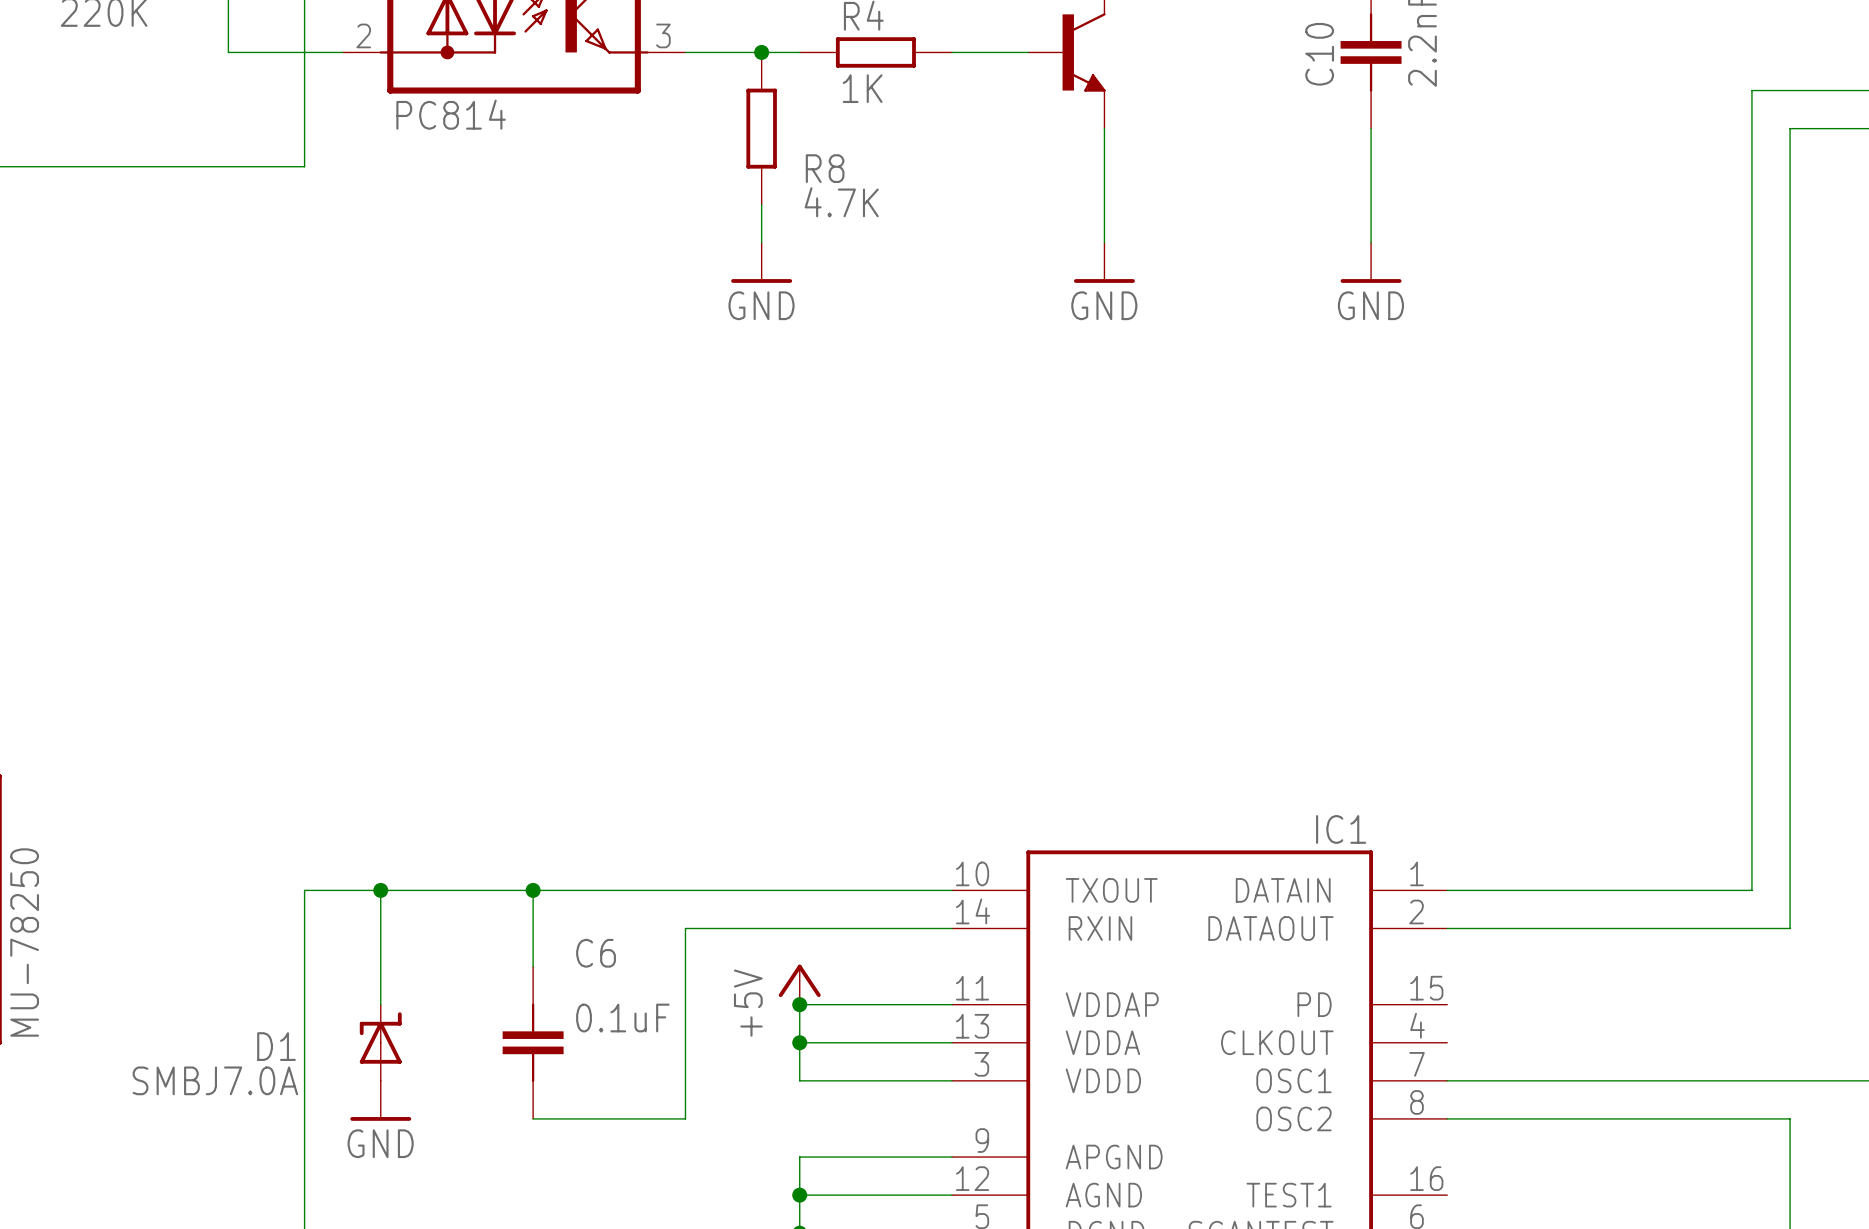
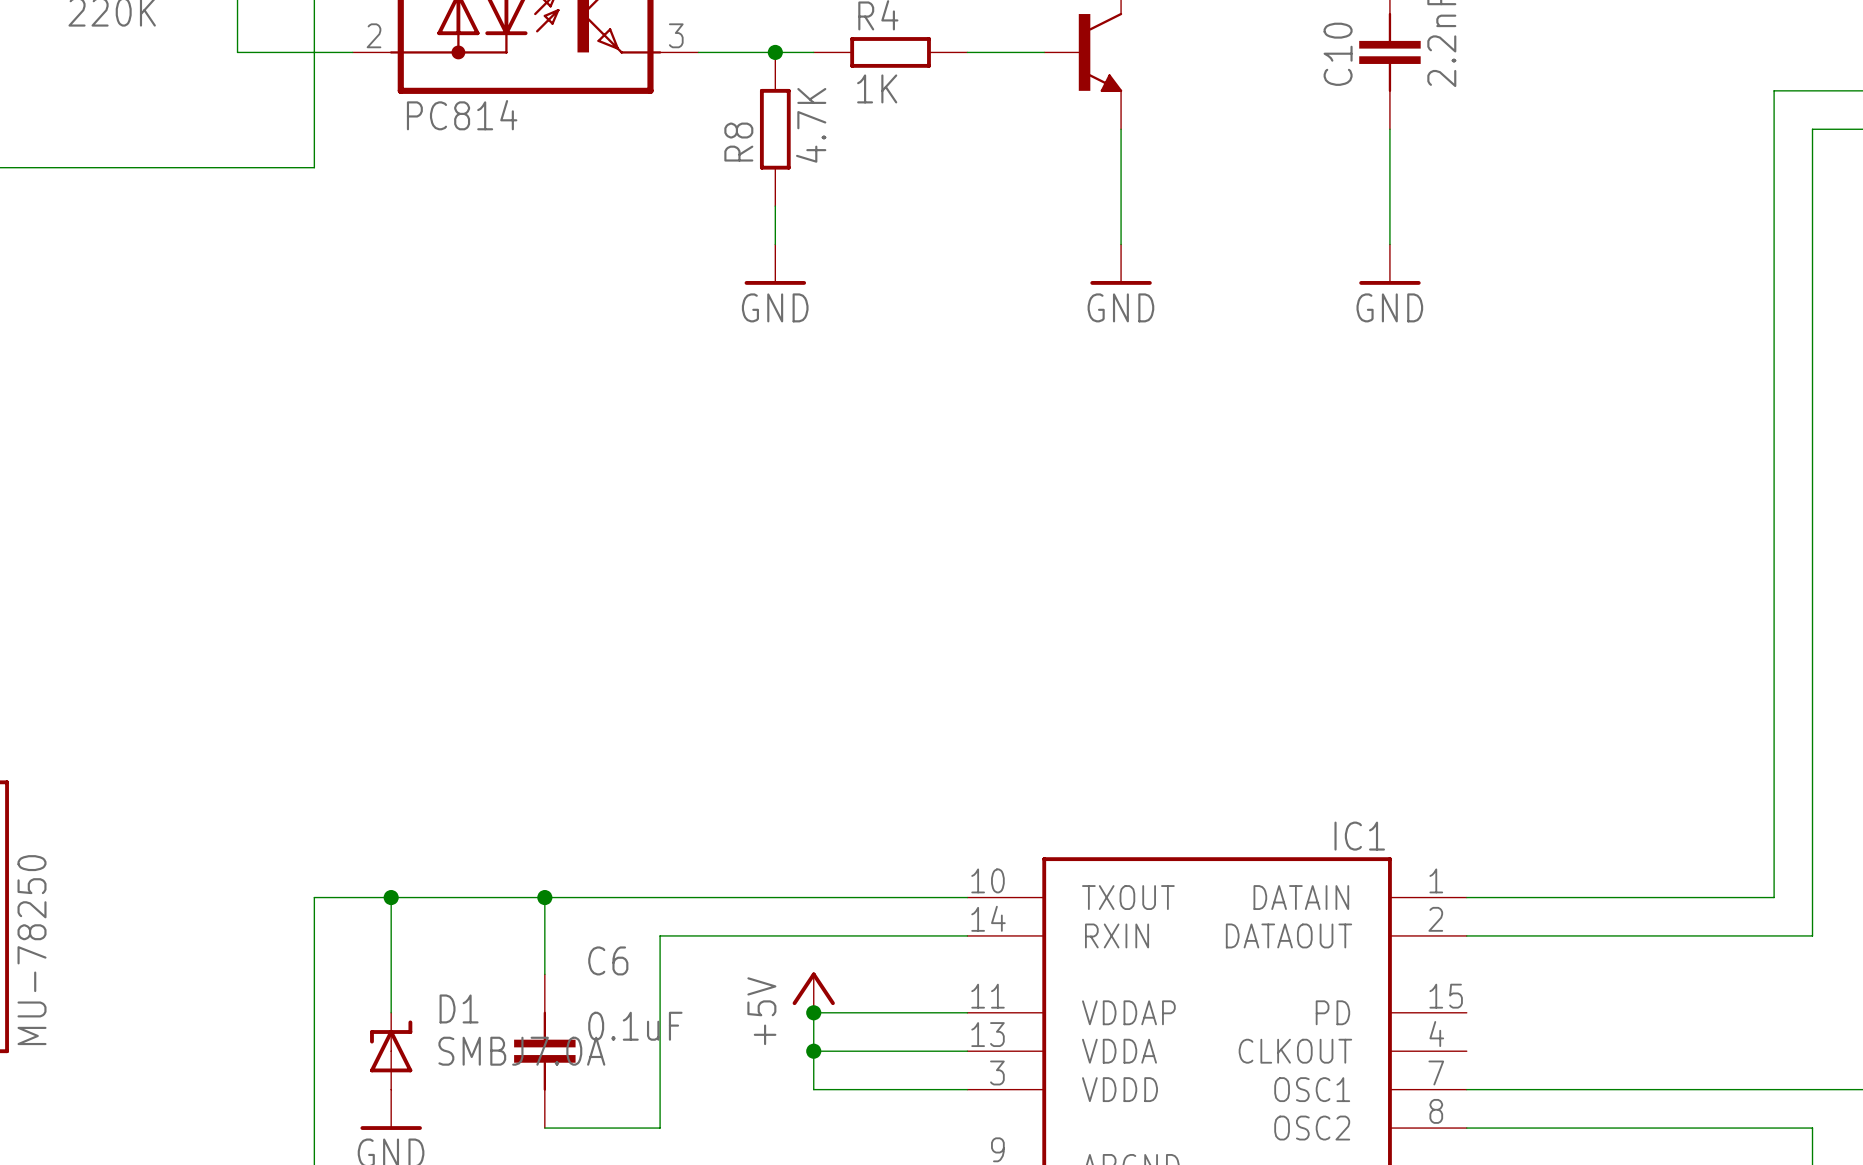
R8 name rotation: 0° (825, 168) -> 90° counterclockwise (738, 142)
R8 name position: R8 (825, 168) -> R8 (738, 142)
R8 value rotation: 0° (841, 202) -> 90° counterclockwise (811, 125)
R8 value position: 4.7K (841, 202) -> 4.7K (811, 125)
wire: (685, 928) (685, 1118) (647, 1118) -> (698, 935) (660, 935) (660, 1128)
D1 name position: D1 (276, 1046) -> D1 (459, 1008)
D1 value position: SMBJ7.0A (215, 1080) -> SMBJ7.0A (521, 1051)

